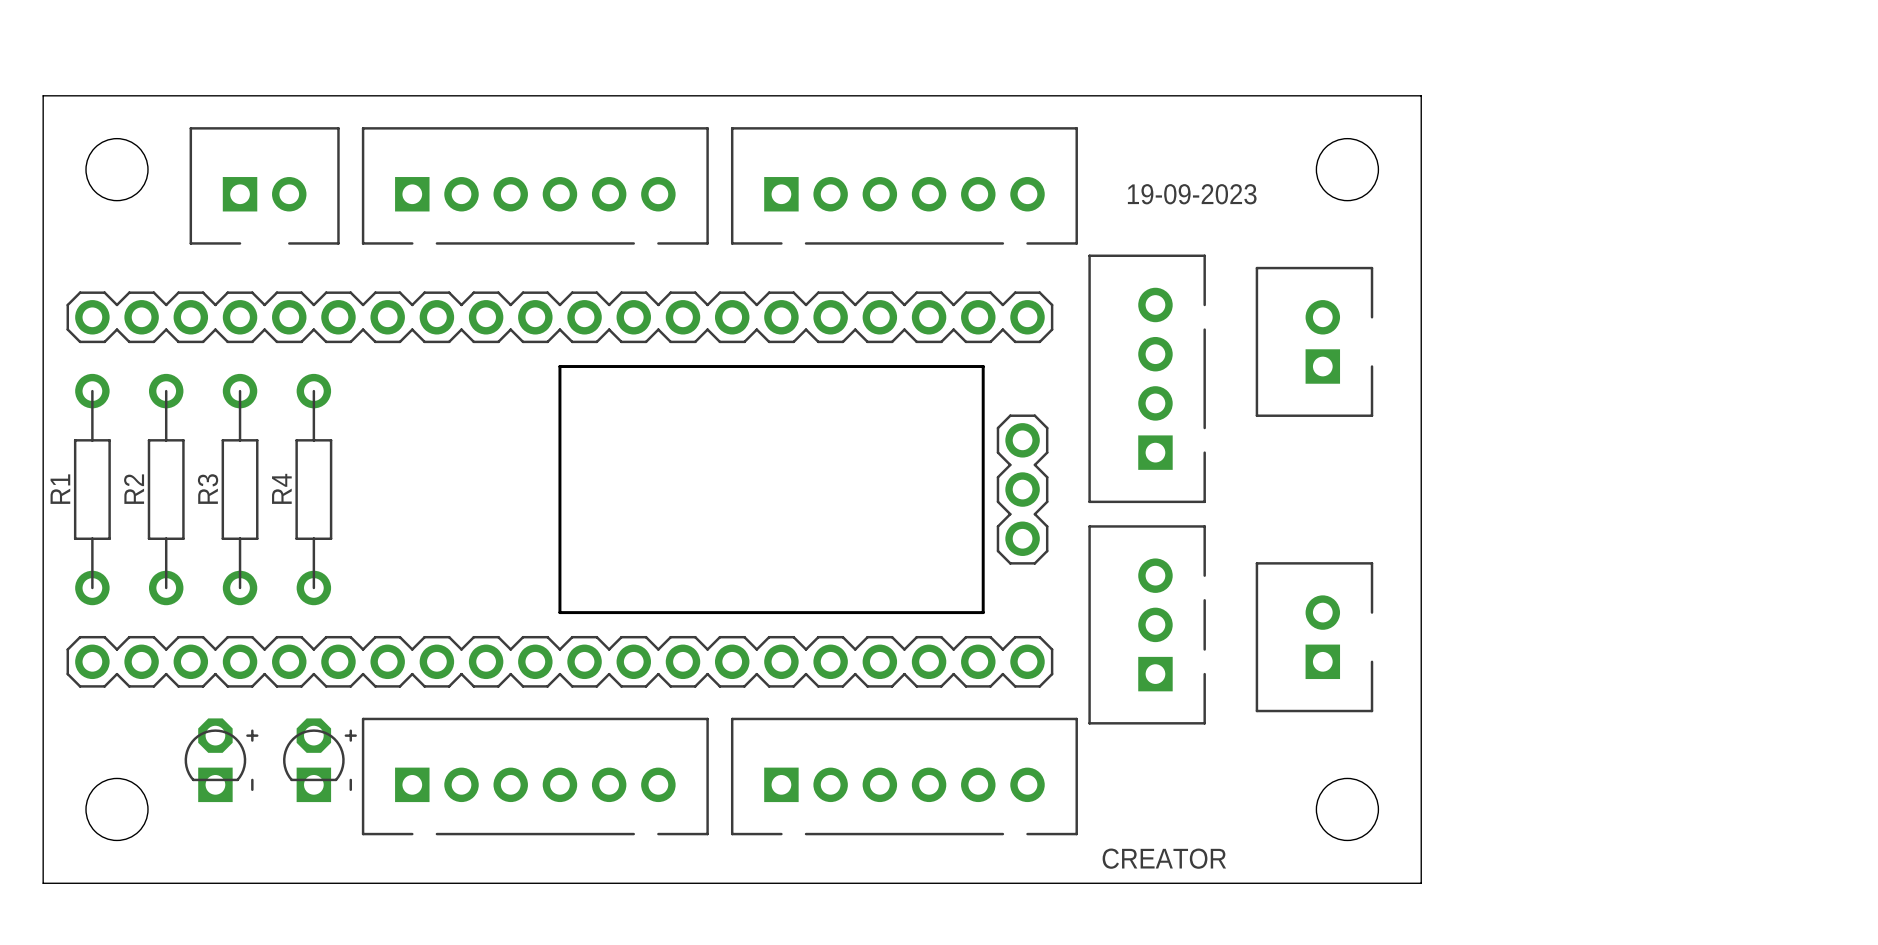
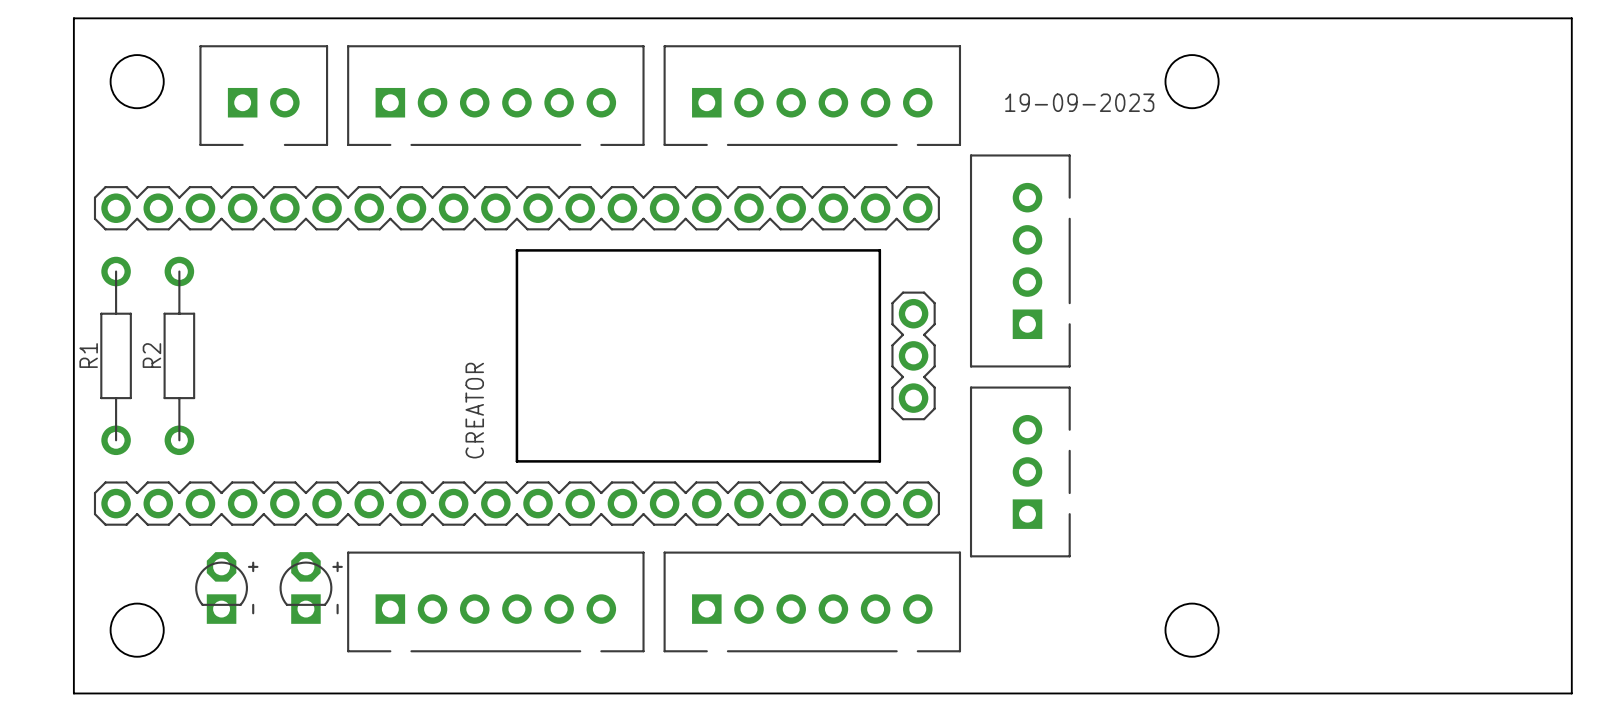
board edge: (1421, 95) (1421, 883) -> (1255, 18) (1571, 18) (1571, 693) (1255, 693)
part: (1314, 341) -> none
R3: (240, 489) -> none
R4: (313, 489) -> none
CREATOR: none -> (474, 410)
part: (1314, 637) -> none
CREATOR: (1164, 858) -> none

